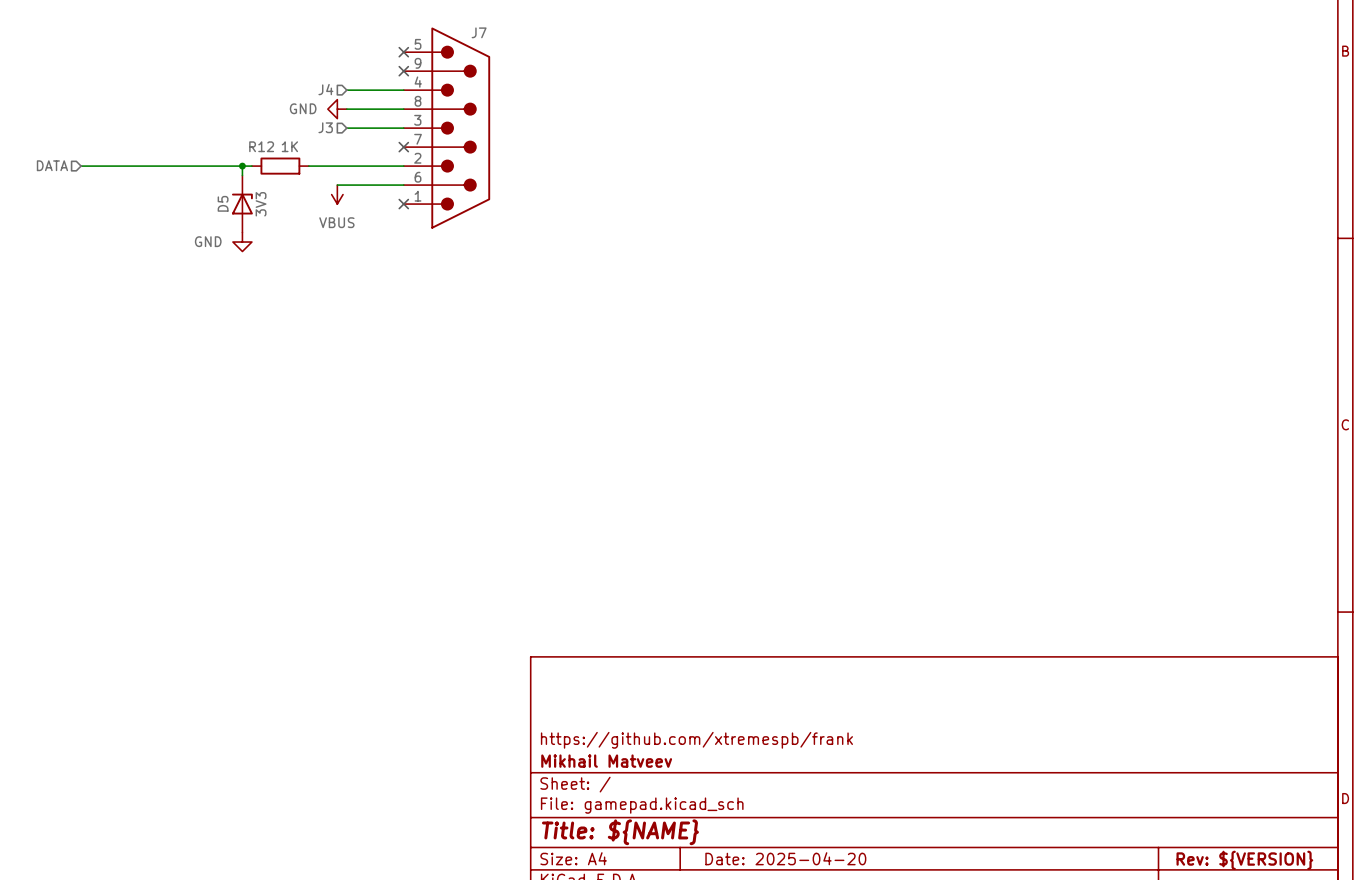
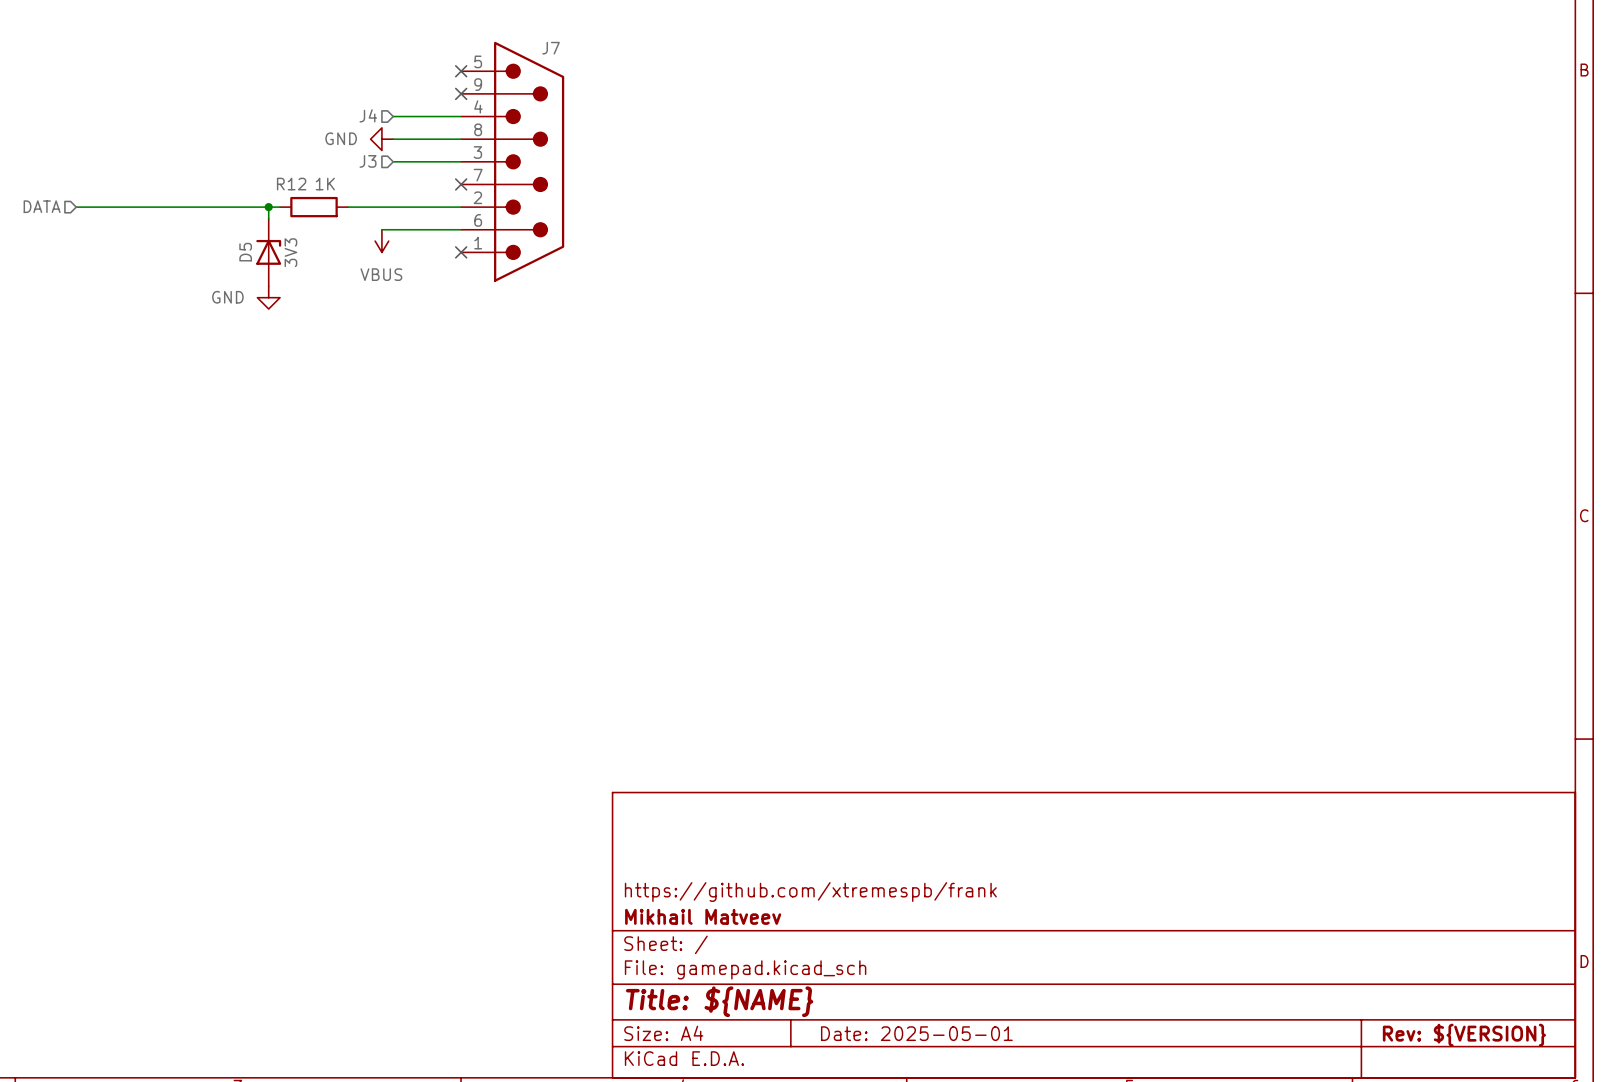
title block: Date: 2025-04-20 (785, 858) -> Date: 2025-05-01 (916, 1033)

